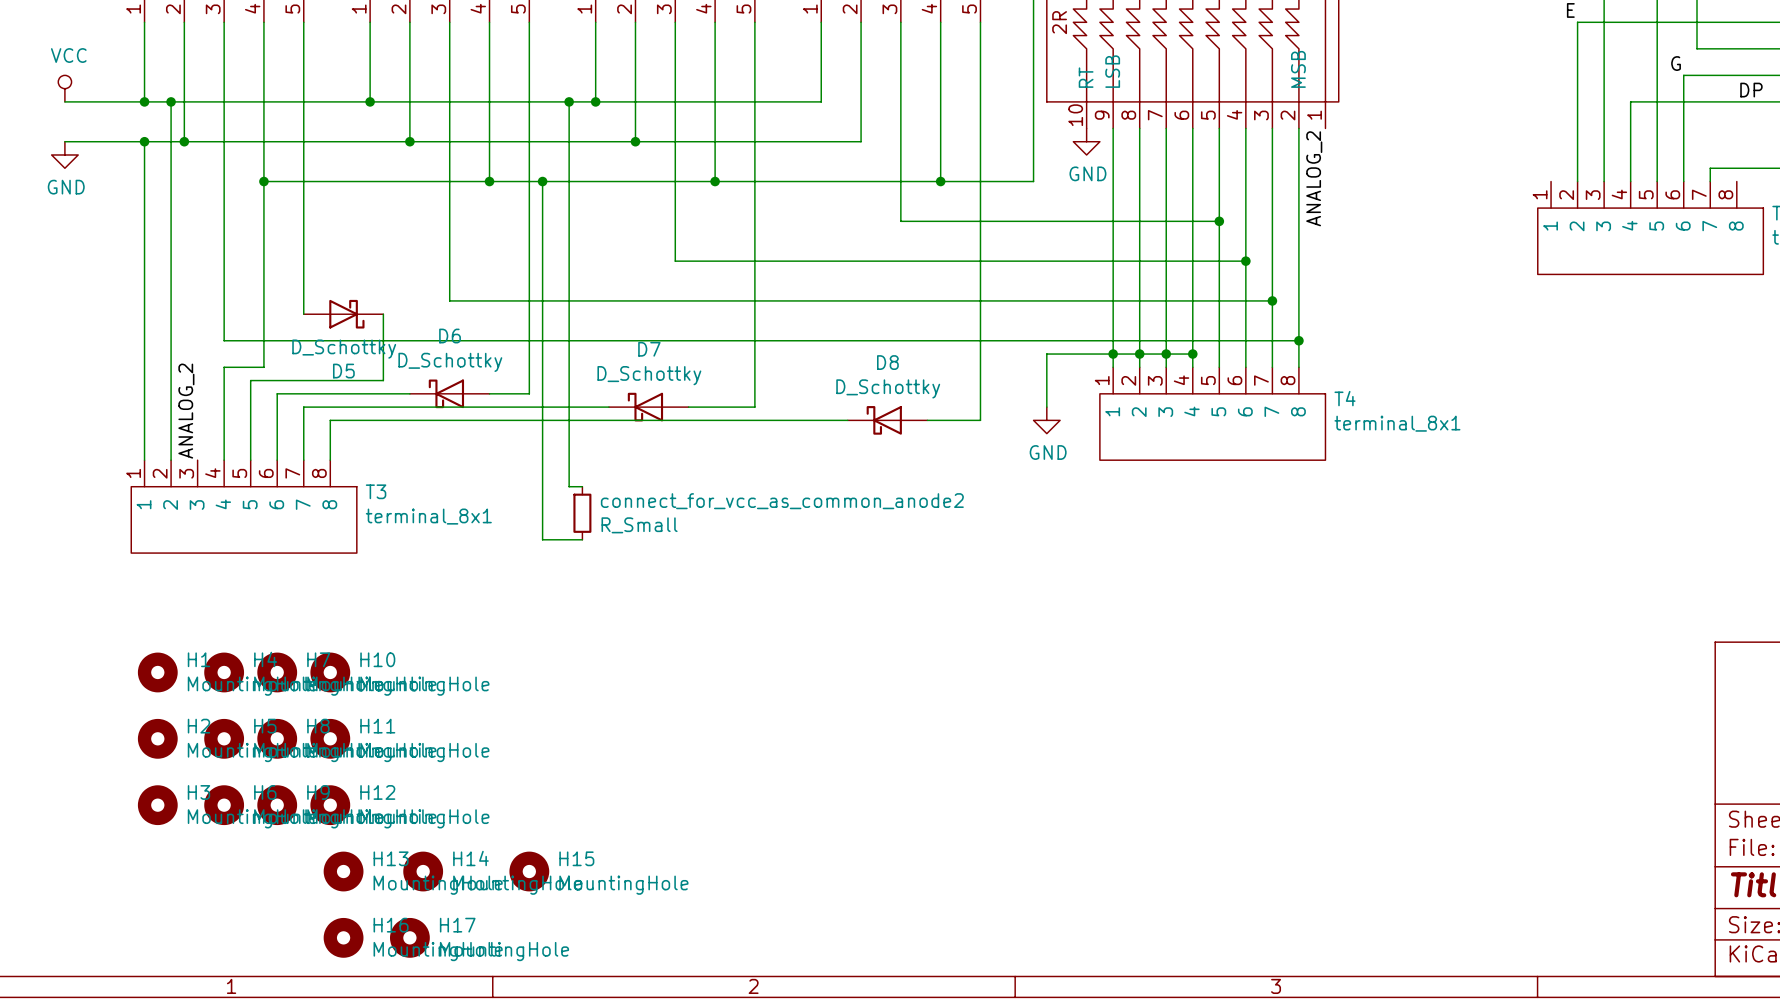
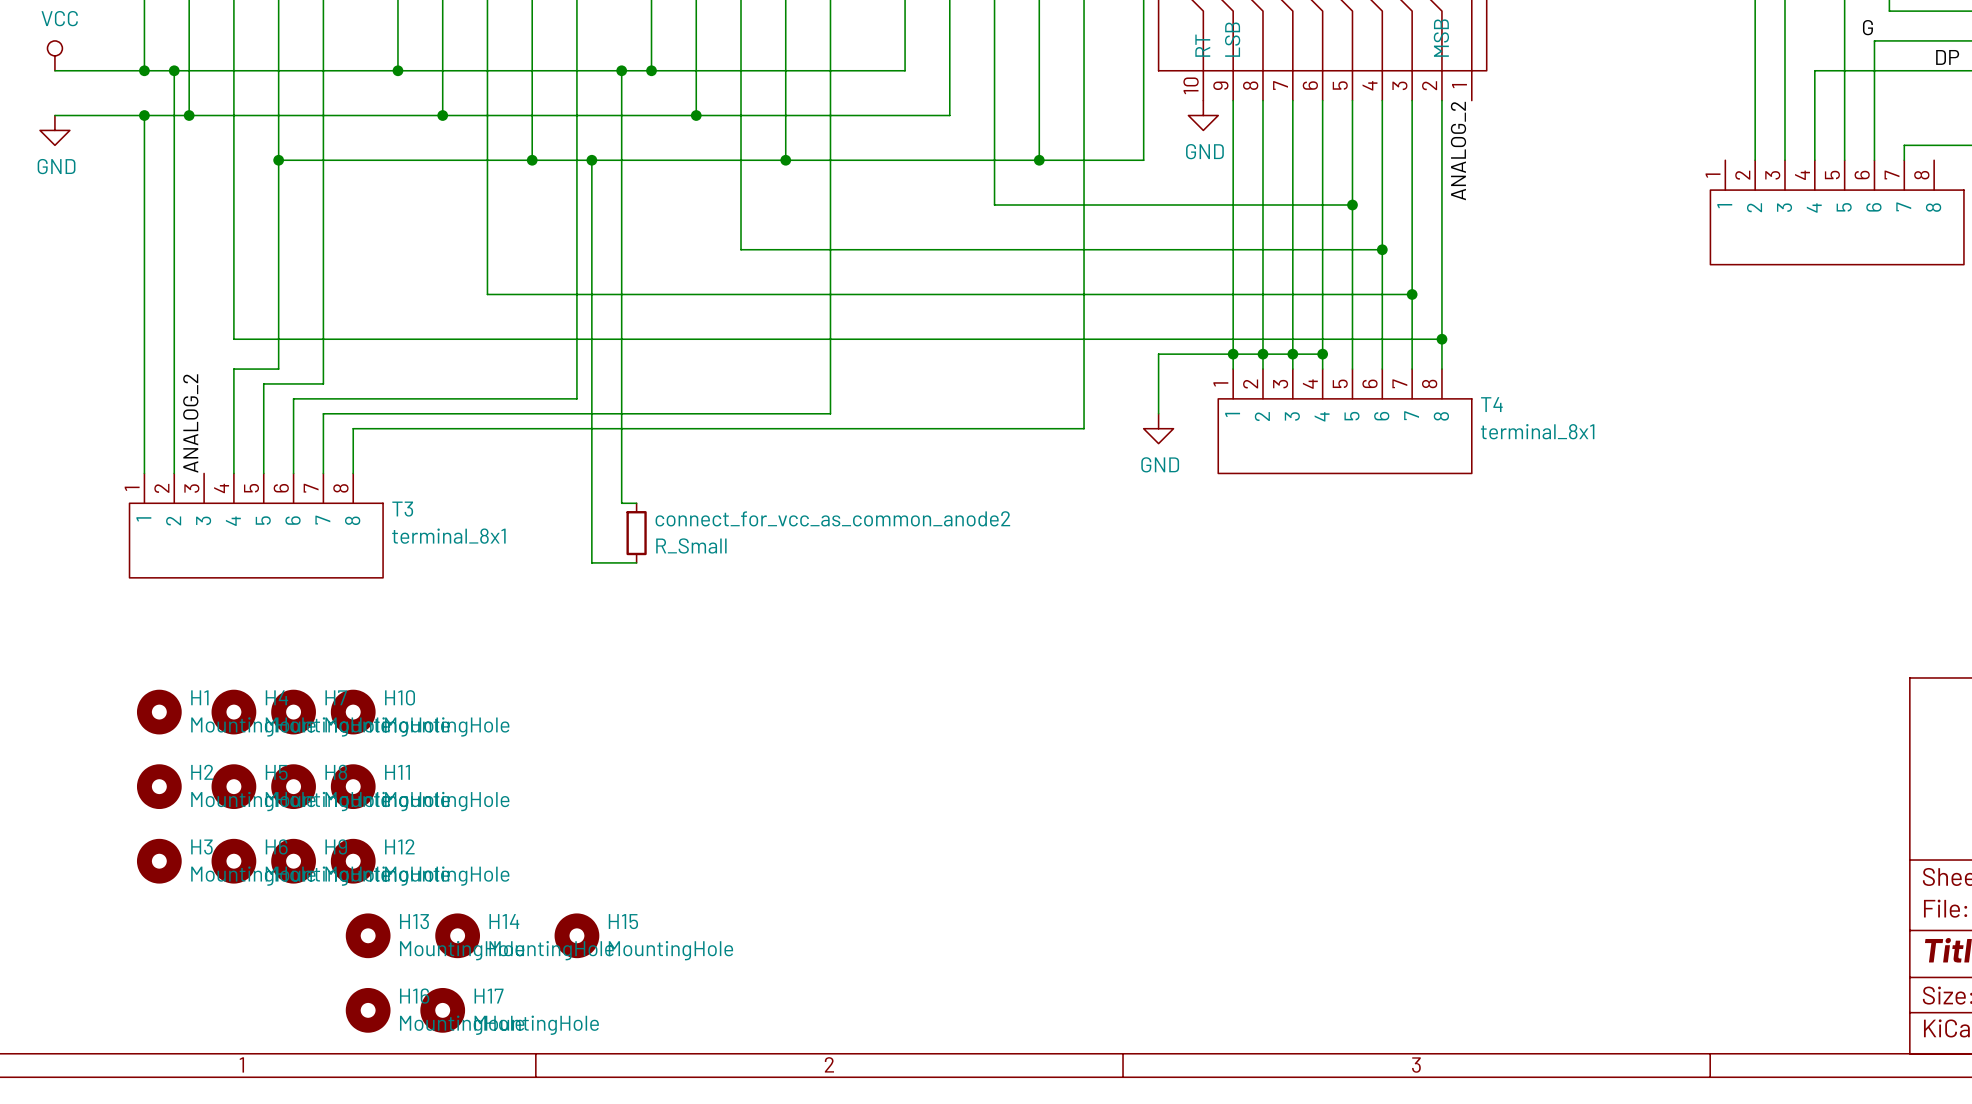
D5: D_Schottky (343, 314) -> none
wire: (383, 314) (383, 380) (303, 380) -> (323, 309) (323, 383)
D6: D_Schottky (449, 393) -> none
D7: D_Schottky (648, 407) -> none
D8: D_Schottky (887, 420) -> none

